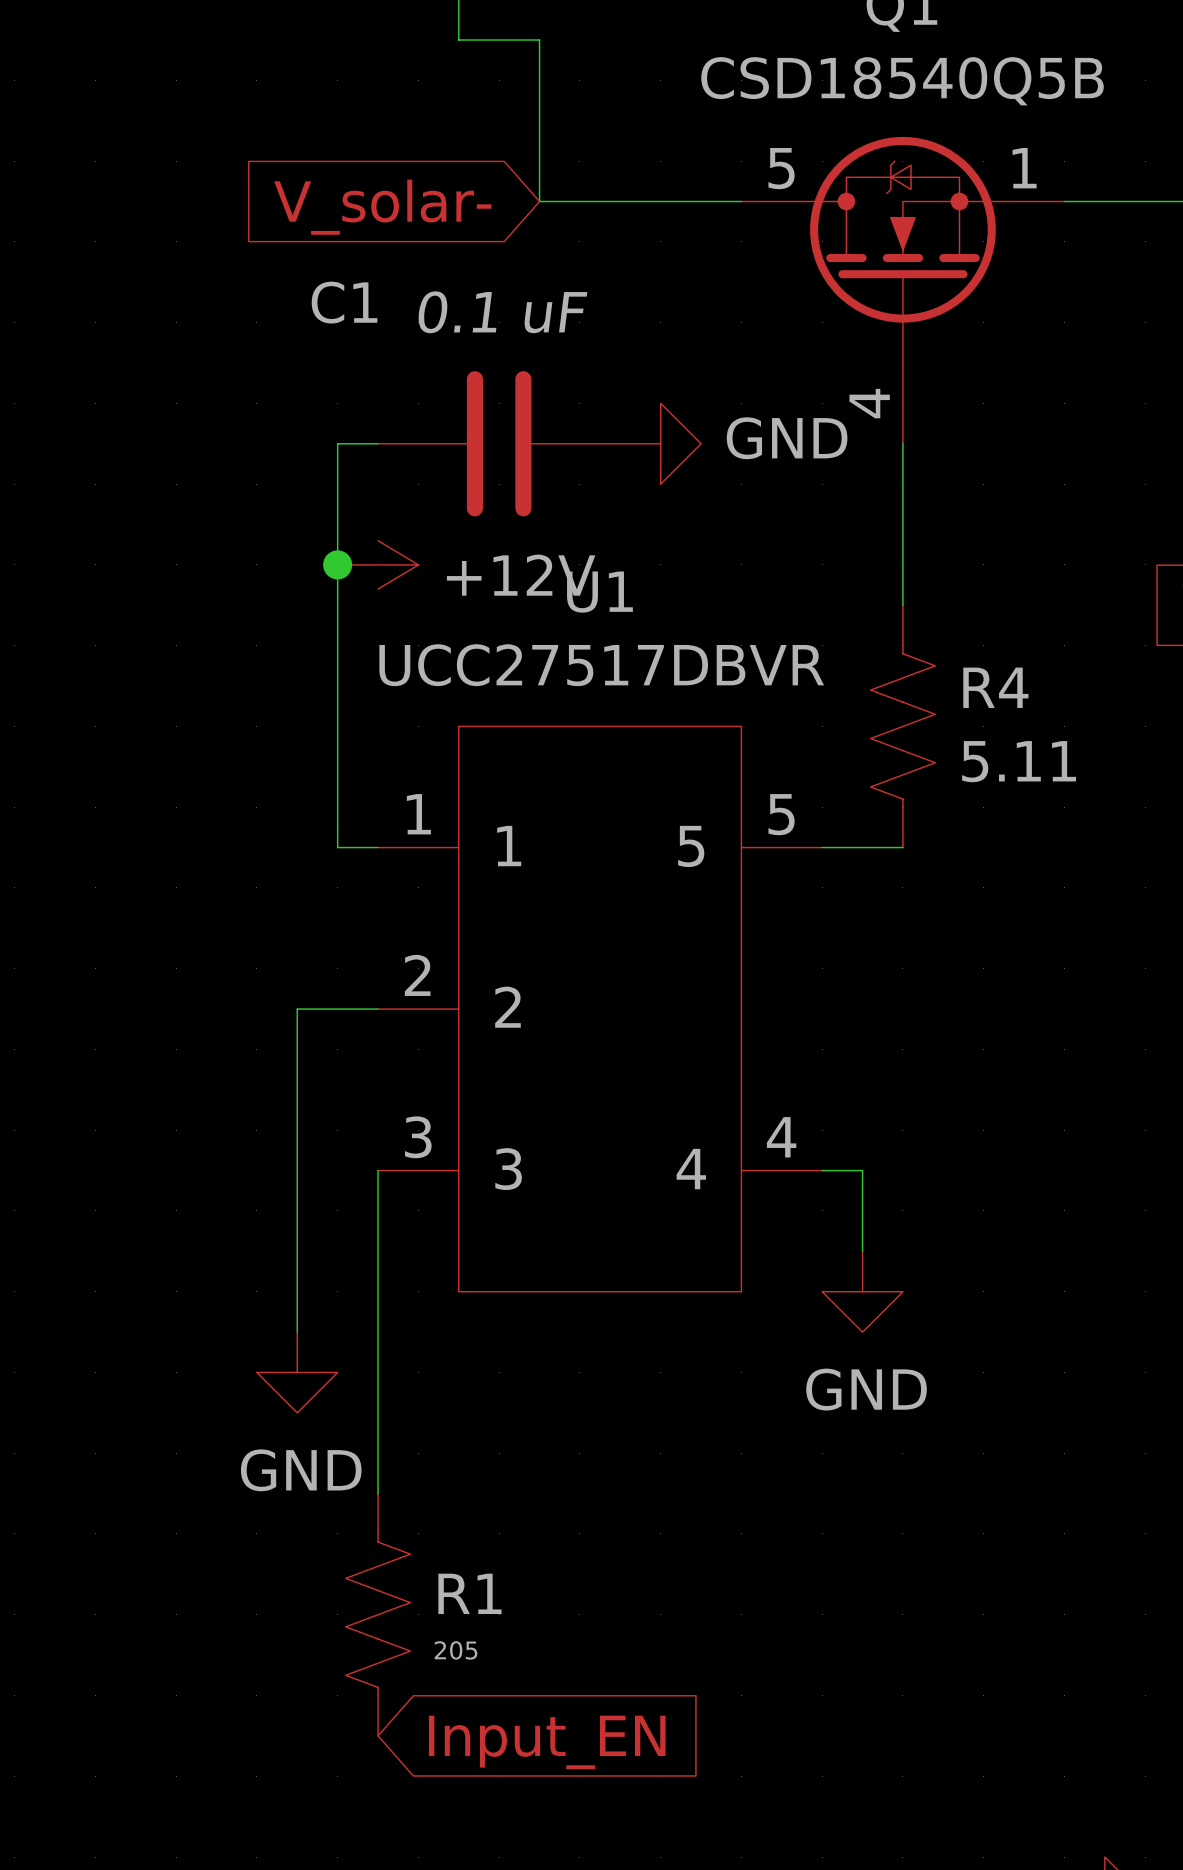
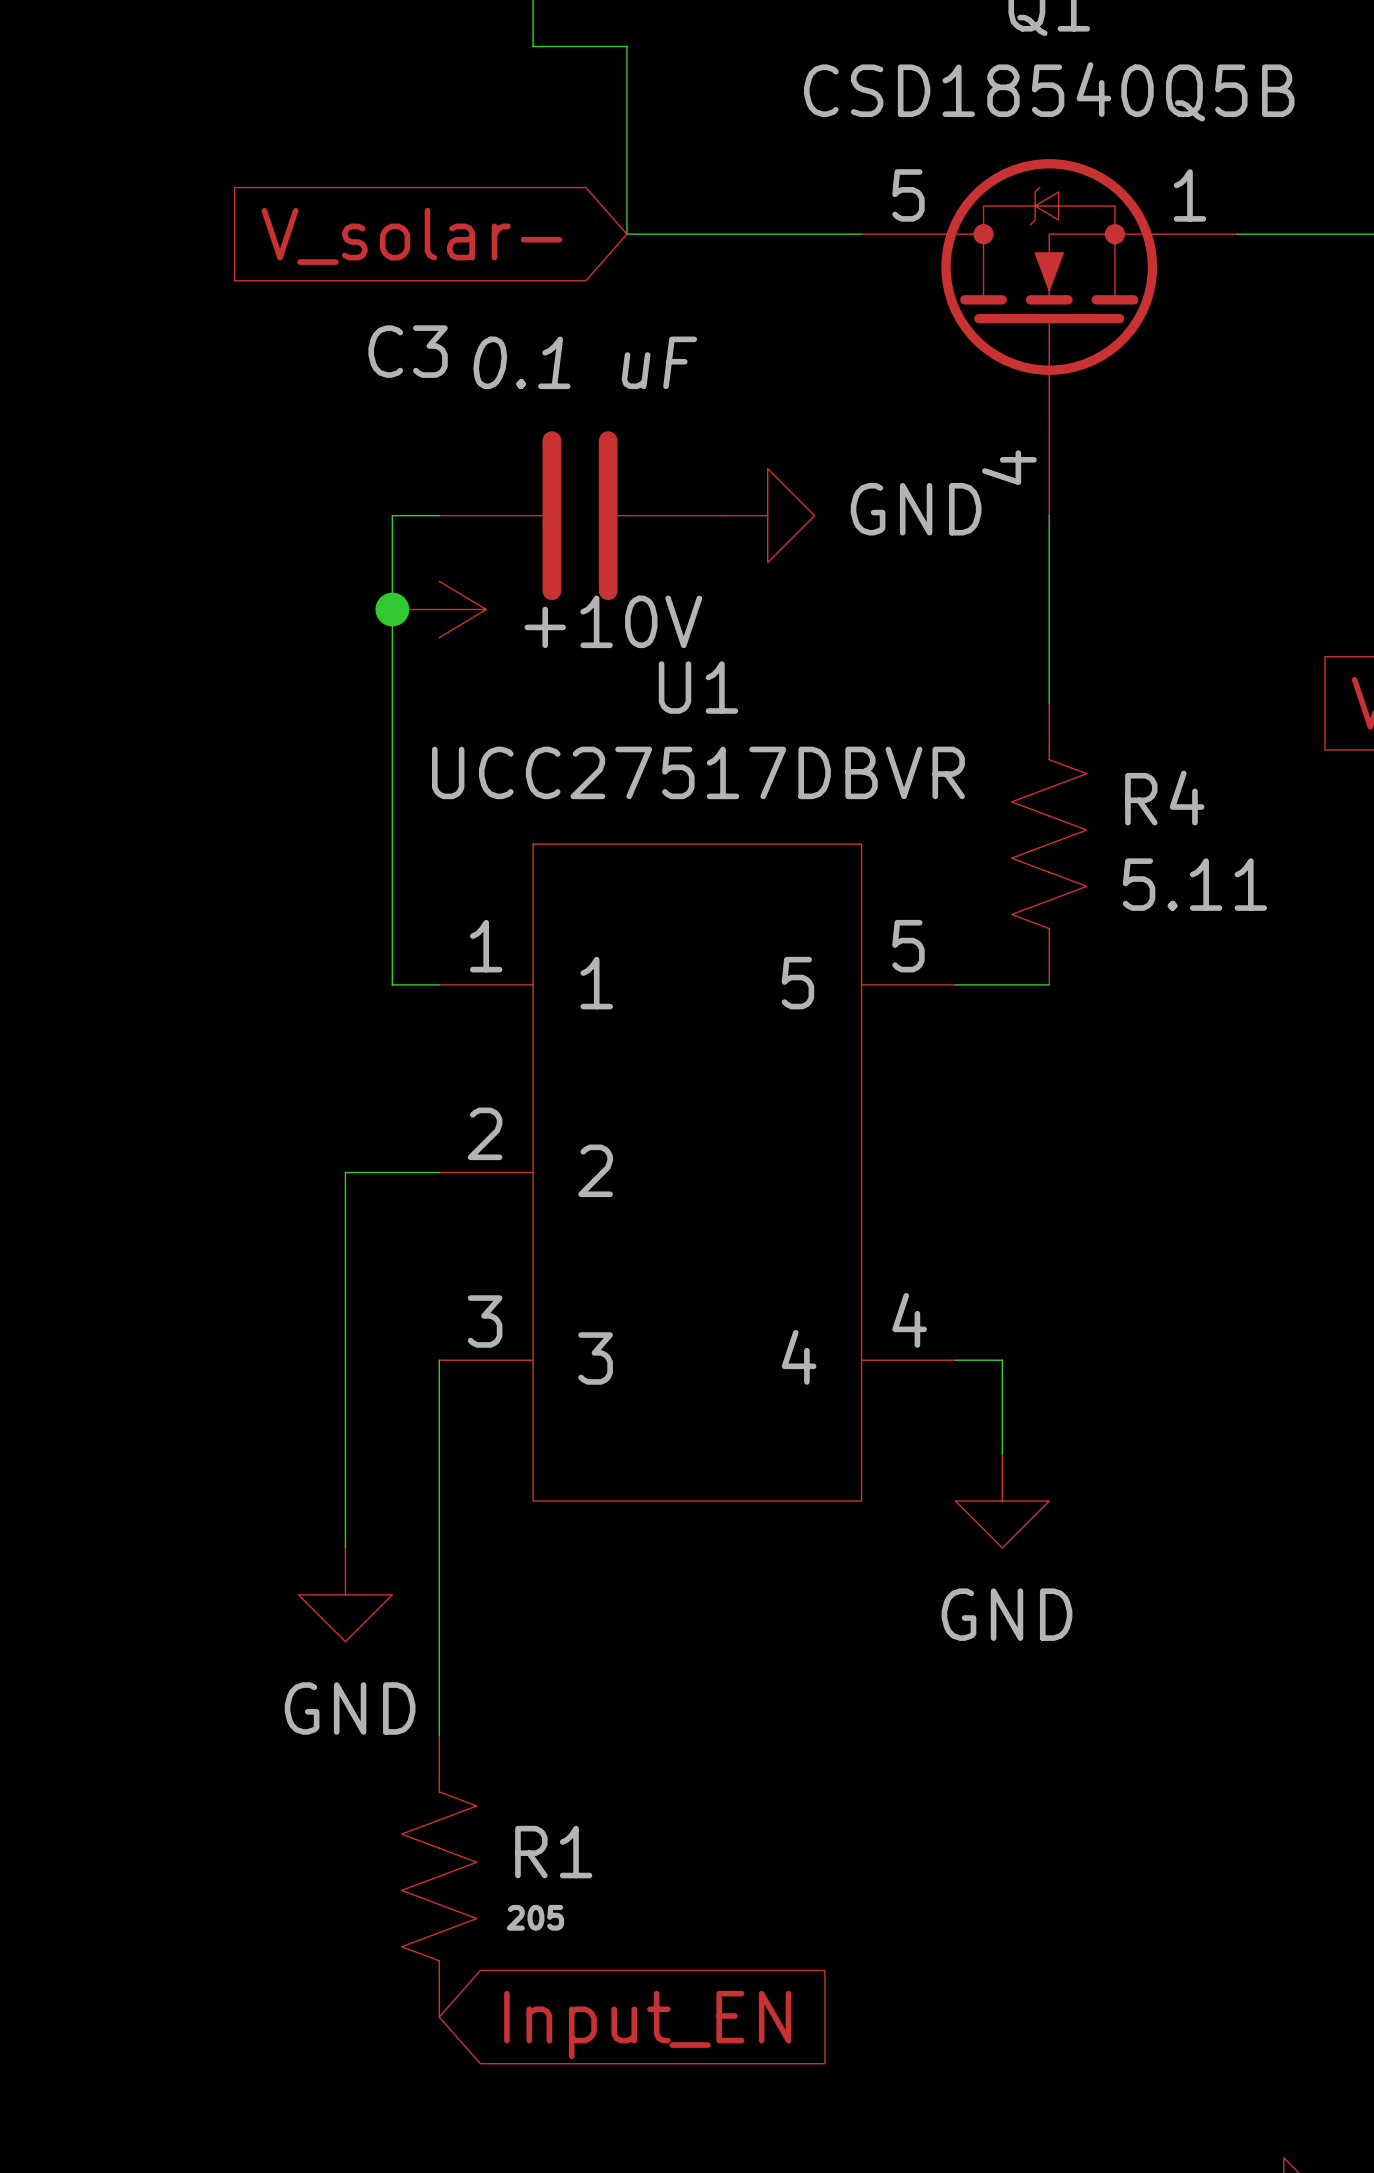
C1 name: C1 (344, 302) -> C3 (408, 351)
power symbol: none -> +10V (439, 609)
junction position: (337, 564) -> (392, 609)
power symbol: +12V (378, 564) -> none

